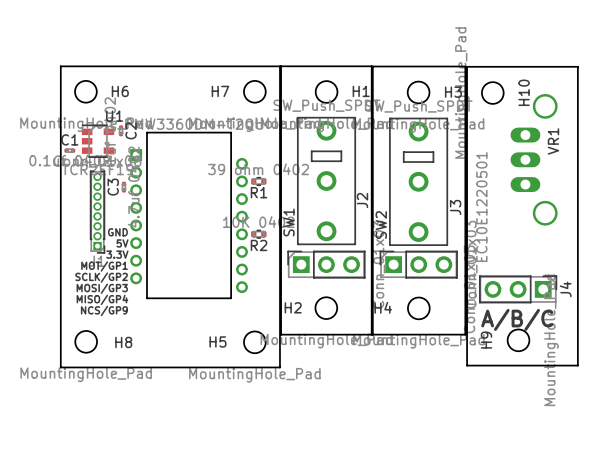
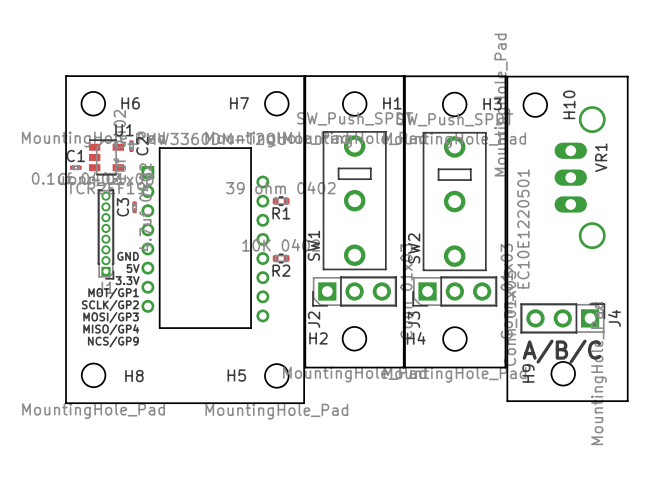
J2 name position: J2 (362, 200) -> J2 (314, 319)
J3 name position: J3 (455, 207) -> J3 (413, 319)
J2 footprint: [287, 250, 366, 279] -> [312, 276, 397, 307]
J3 footprint: [379, 250, 458, 279] -> [412, 276, 498, 307]

